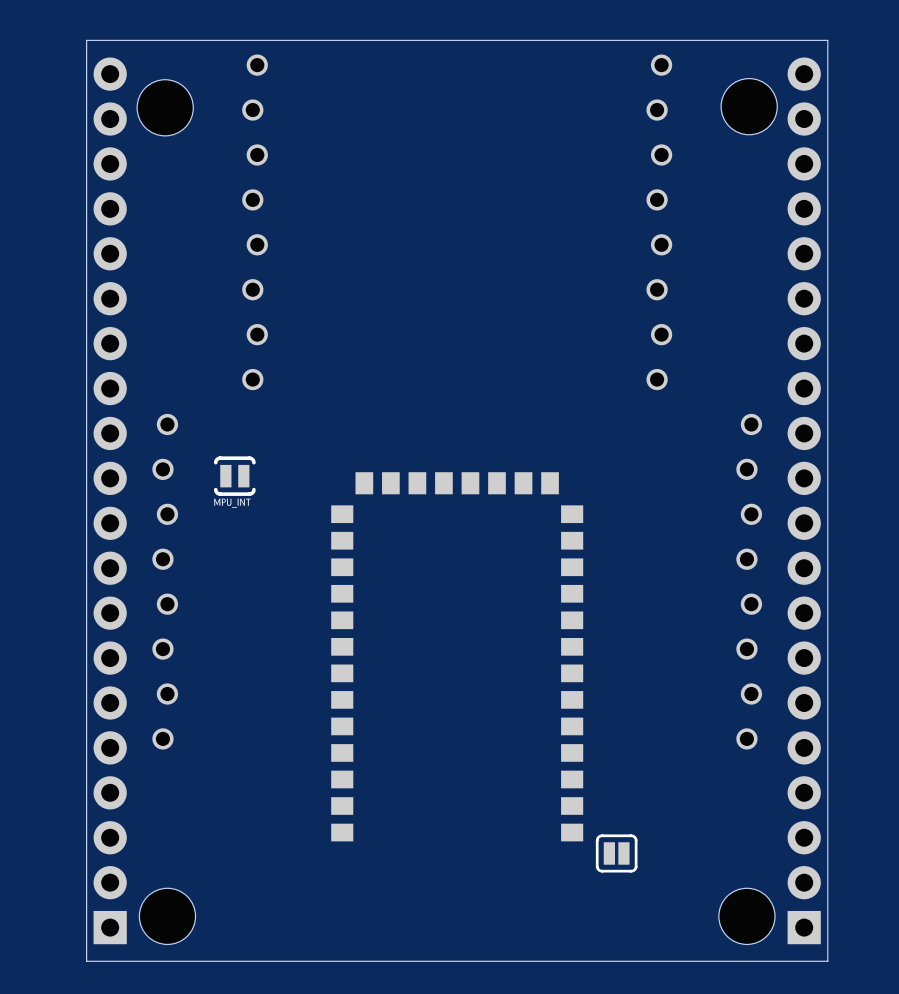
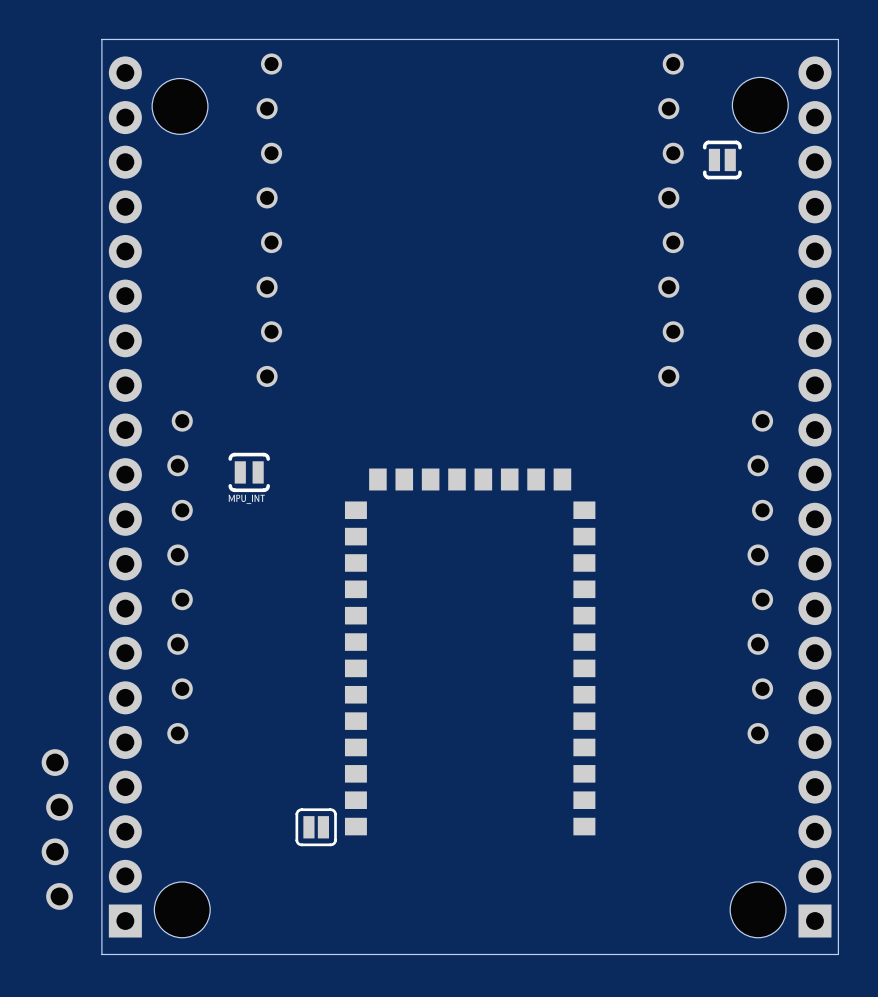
part: none -> (722, 159)
part: none -> (57, 829)
part rotation: 0° (616, 853) -> 180° (316, 827)
part position: (616, 853) -> (316, 827)

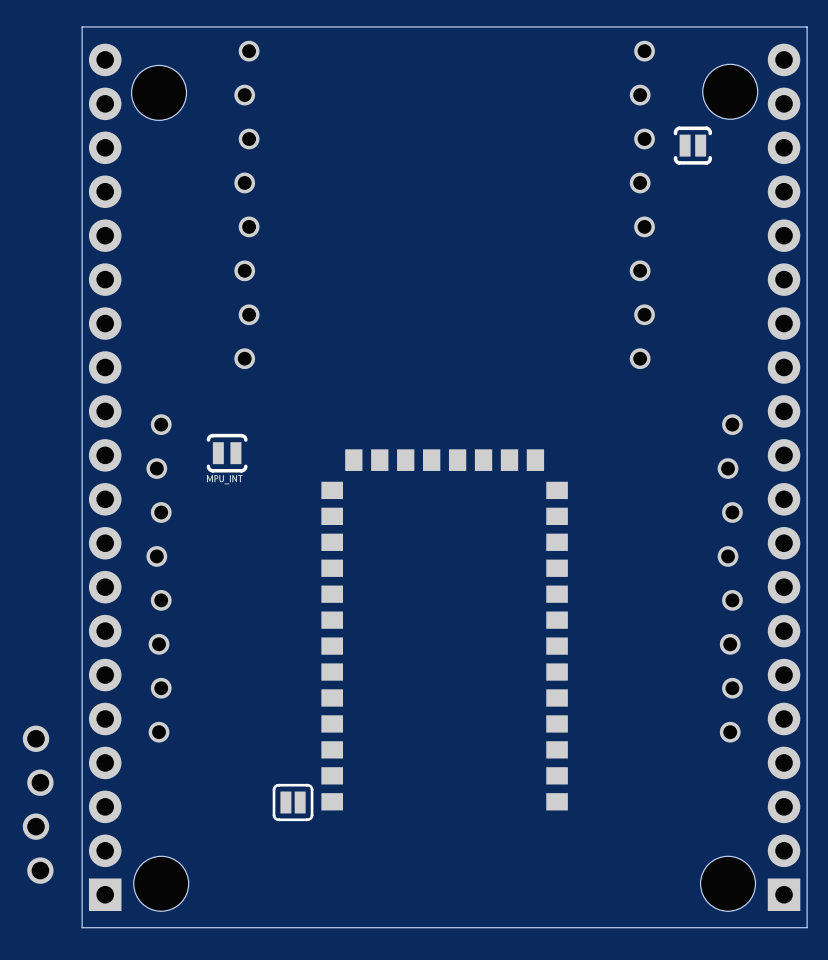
part: (180, 577) -> none
part: (760, 577) -> none
part: none -> (159, 578)
part: none -> (730, 578)

